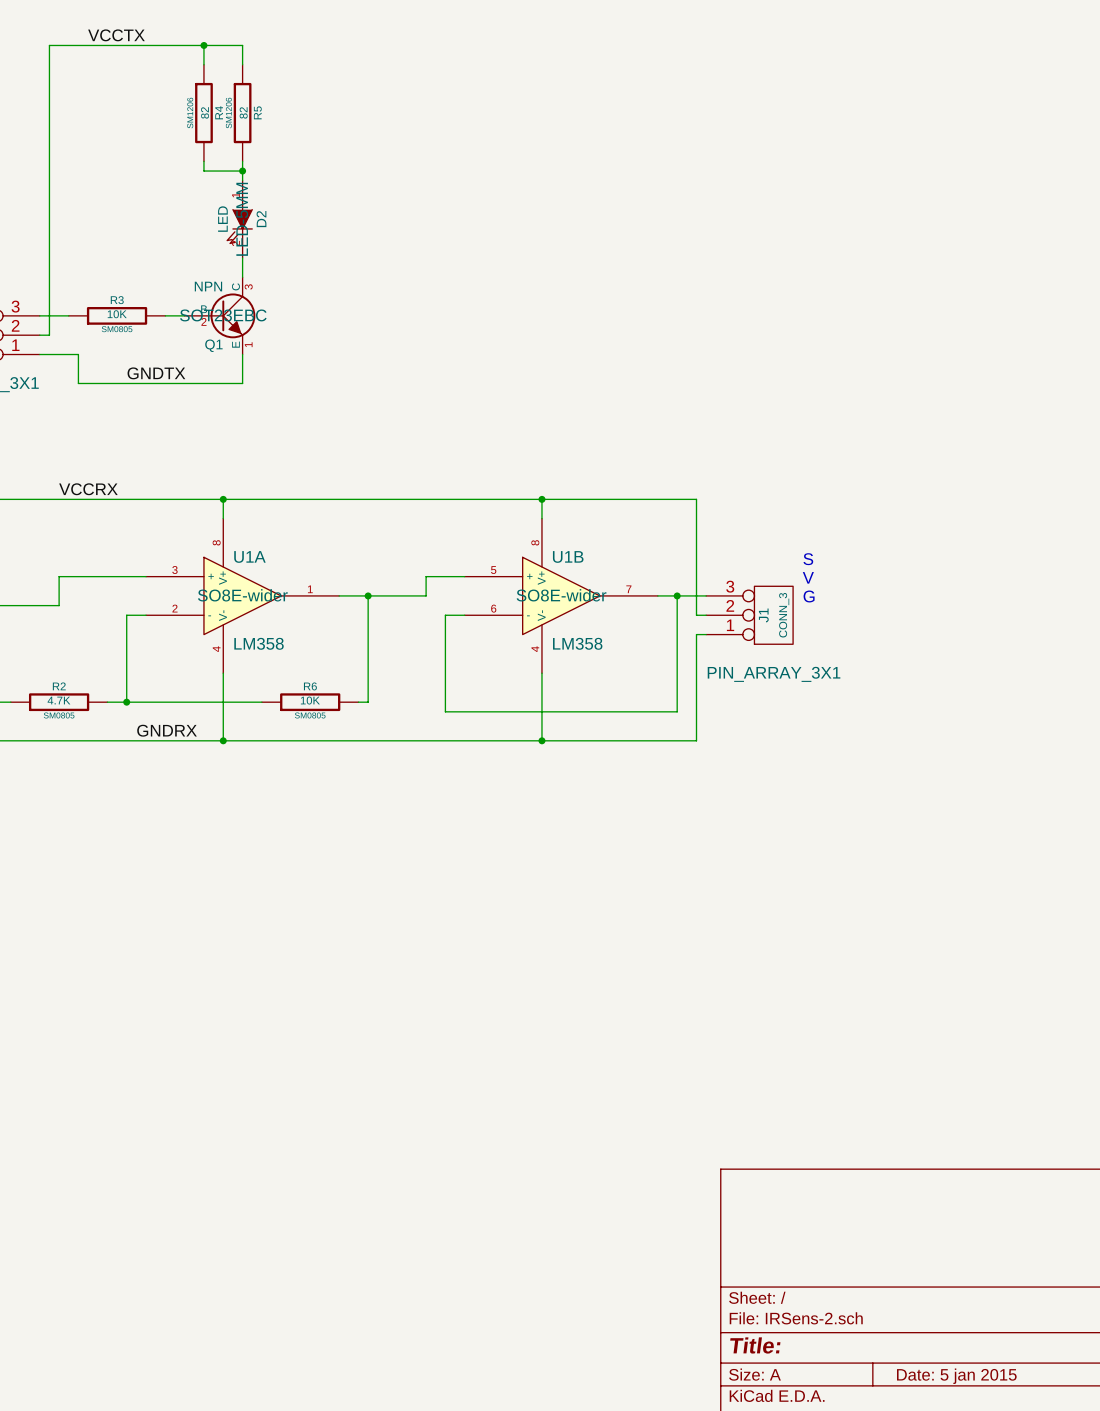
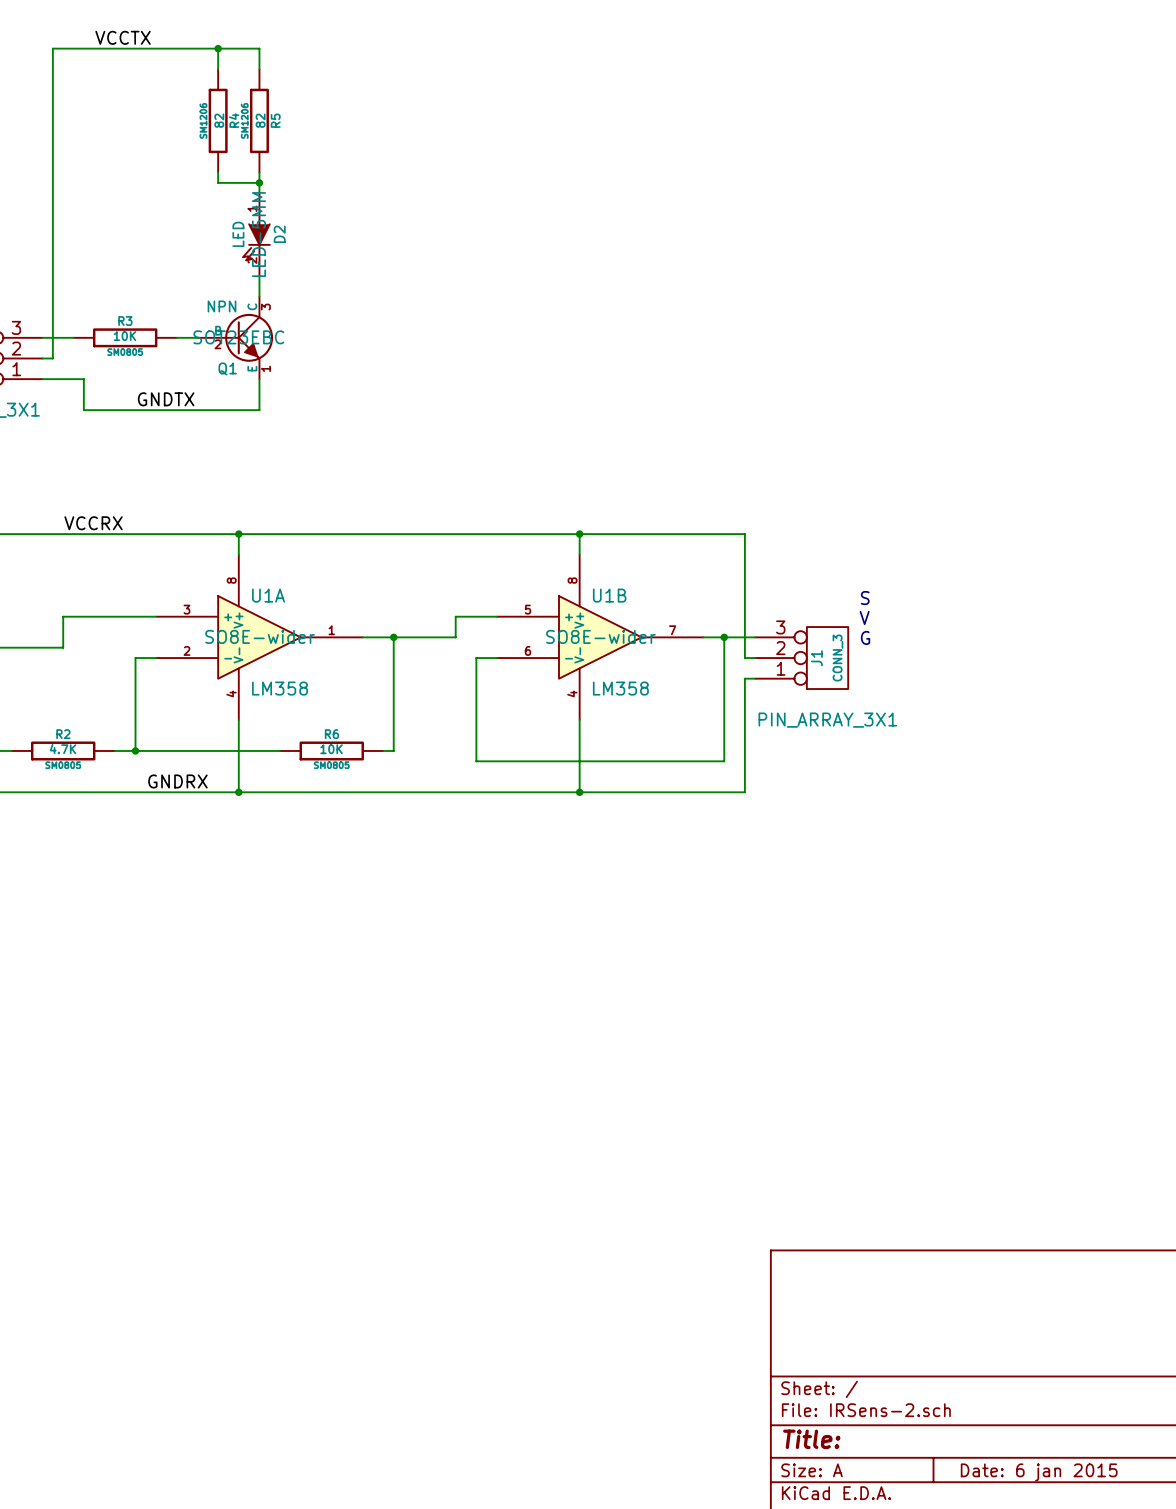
title block: Date: 5 jan 2015 (956, 1376) -> Date: 6 jan 2015 (1039, 1472)

